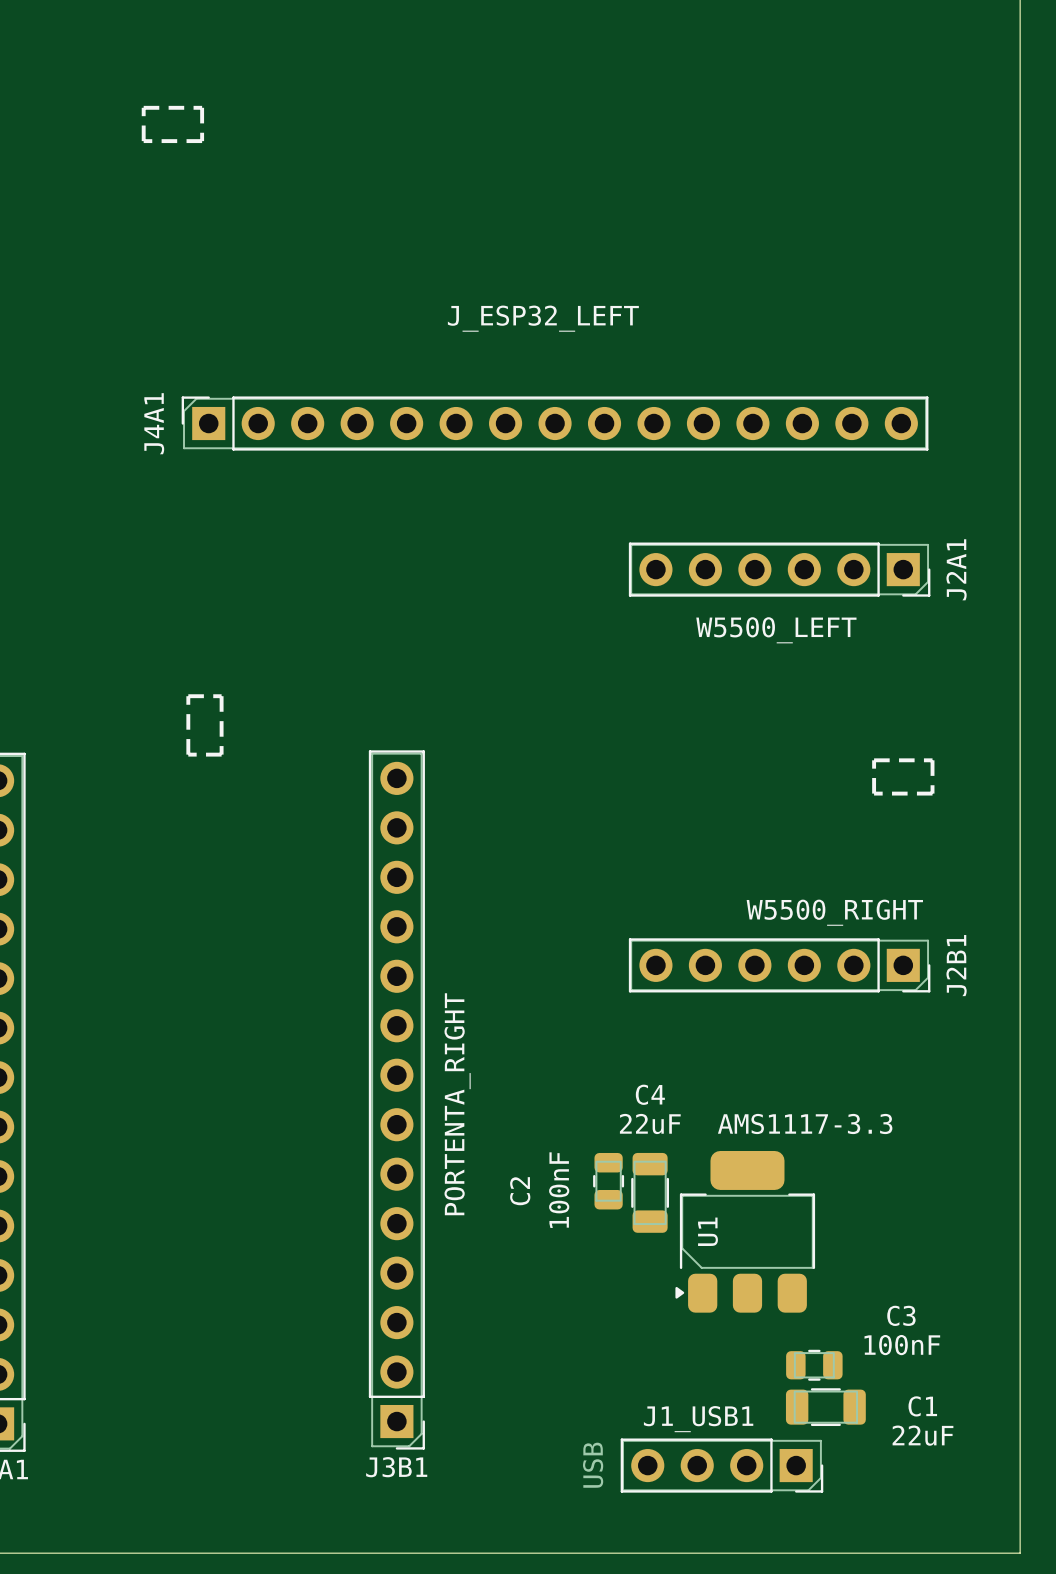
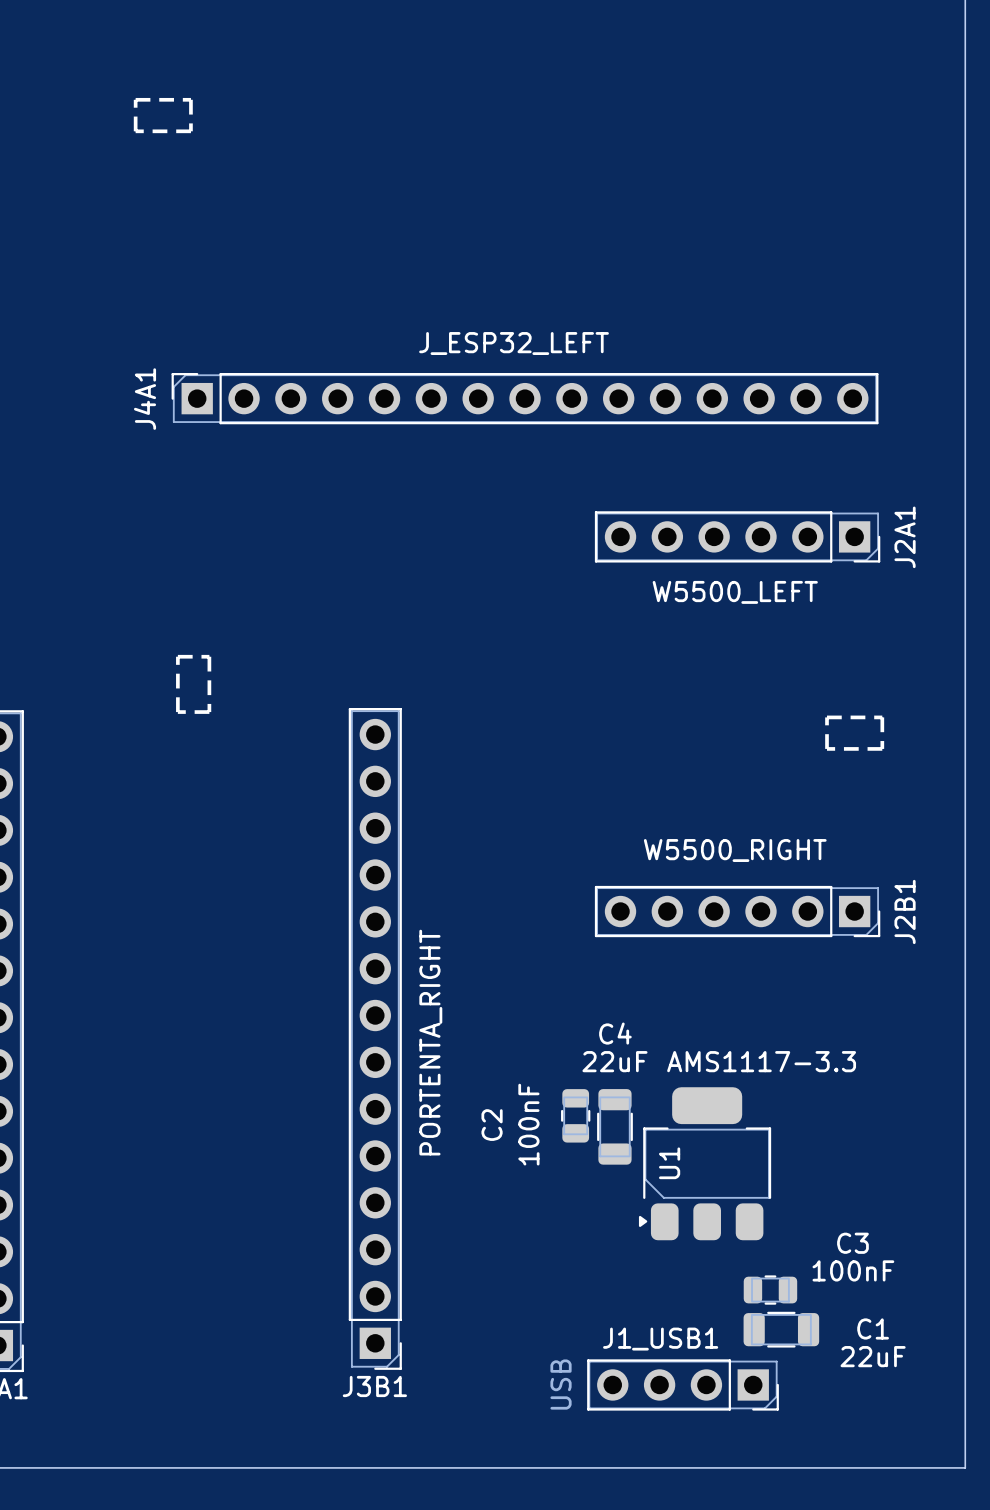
J4A1 value position: J_ESP32_LEFT (543, 318) -> J_ESP32_LEFT (514, 343)
J2B1 value position: W5500_RIGHT (834, 912) -> W5500_RIGHT (735, 850)

